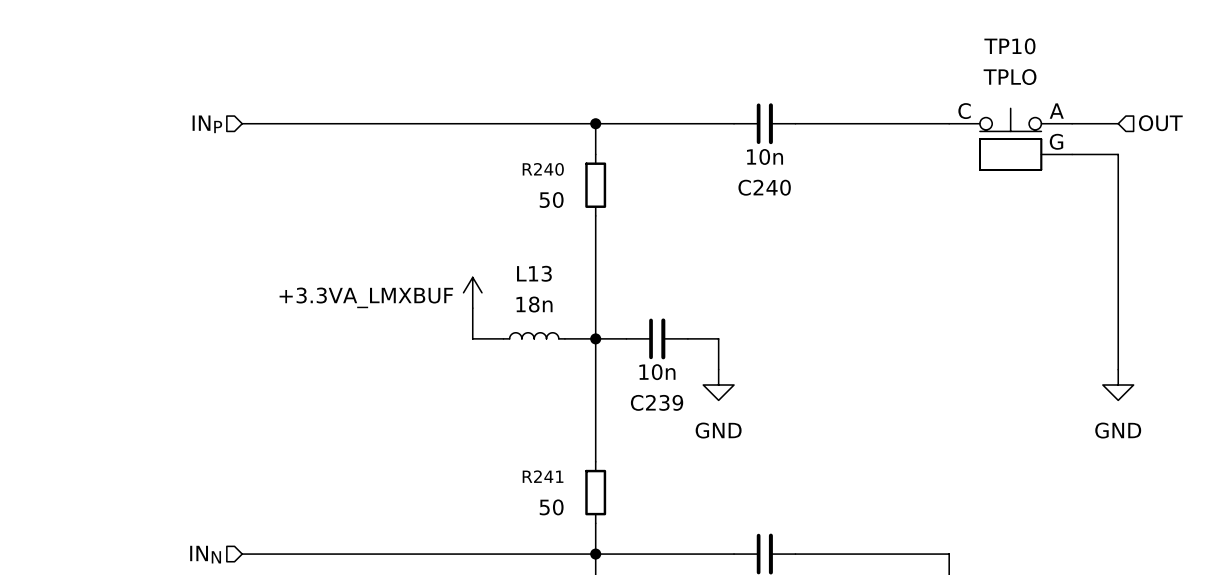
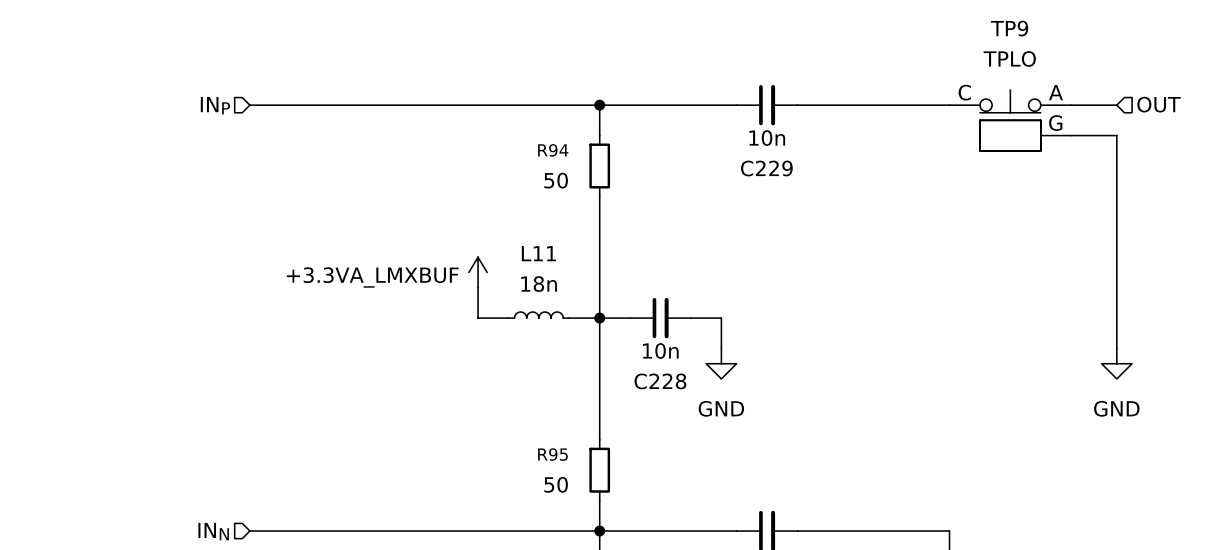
TP10 name: TP10 (1009, 46) -> TP9 (1009, 28)
R240 name: R240 (543, 169) -> R94 (553, 150)
C240 name: C240 (764, 187) -> C229 (766, 168)
L13 name: L13 (534, 273) -> L11 (538, 253)
C239 name: C239 (657, 402) -> C228 (660, 381)
R241 name: R241 (543, 476) -> R95 (552, 454)

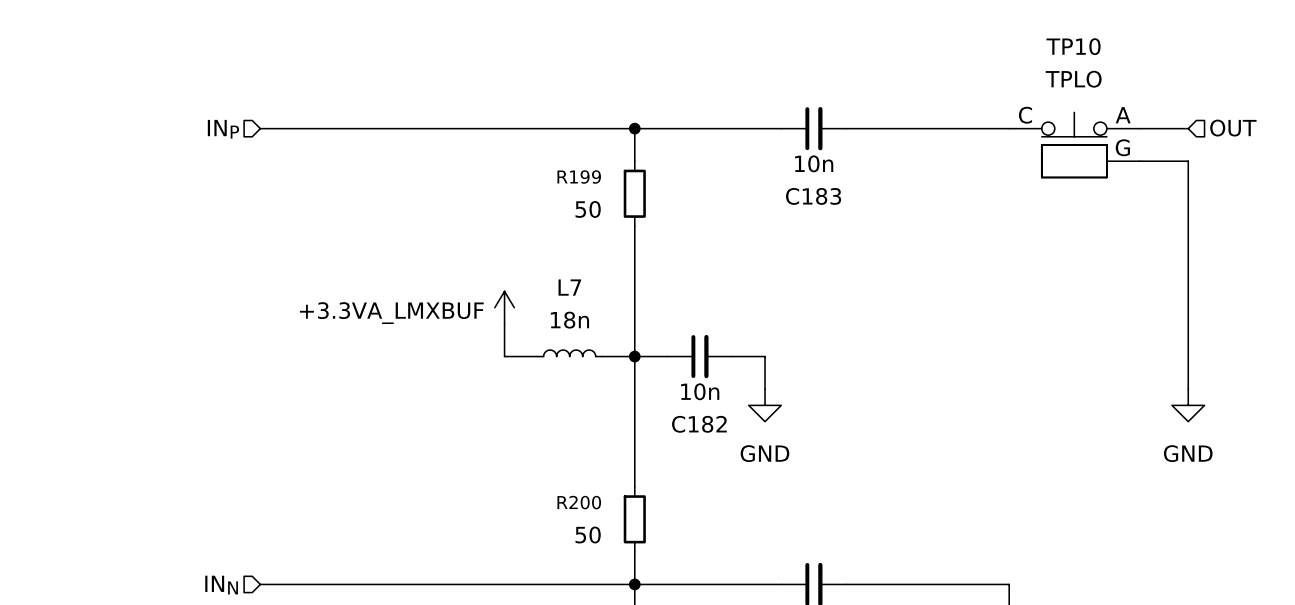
TP9 name: TP9 (1009, 28) -> TP10 (1073, 46)
R94 name: R94 (553, 150) -> R199 (579, 177)
C229 name: C229 (766, 168) -> C183 (813, 196)
L11 name: L11 (538, 253) -> L7 (569, 287)
C228 name: C228 (660, 381) -> C182 (699, 424)
R95 name: R95 (552, 454) -> R200 (579, 502)

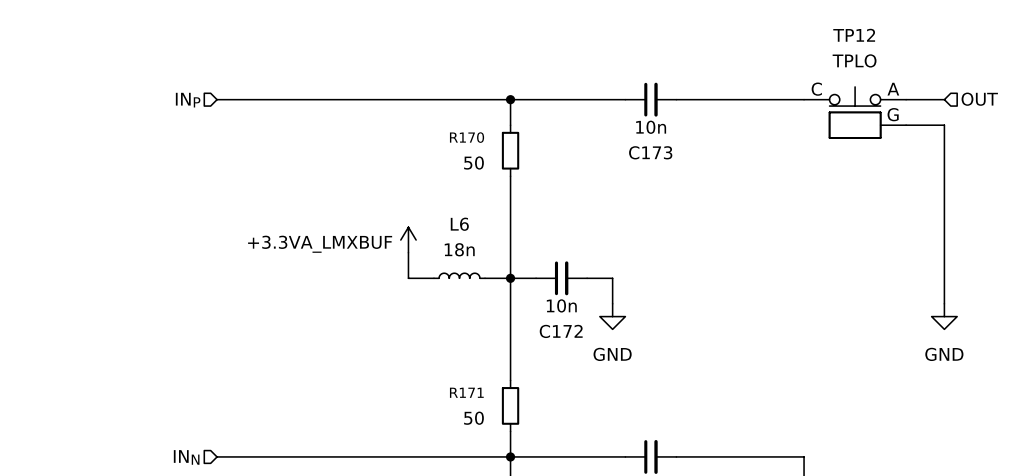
TP10 name: TP10 (1073, 46) -> TP12 (854, 35)
R199 name: R199 (579, 177) -> R170 (467, 137)
C183 name: C183 (813, 196) -> C173 (650, 152)
L7 name: L7 (569, 287) -> L6 (459, 224)
C182 name: C182 (699, 424) -> C172 (561, 331)
R200 name: R200 (579, 502) -> R171 (466, 392)

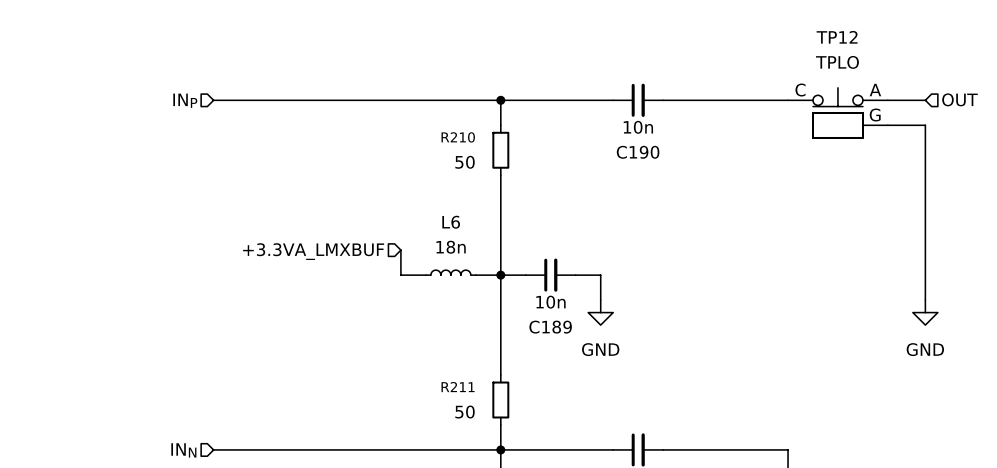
R170 name: R170 (467, 137) -> R210 (458, 137)
C173 name: C173 (650, 152) -> C190 (638, 152)
power symbol: +3.3VA_LMXBUF (408, 240) -> none
hierarchical label: none -> +3.3VA_LMXBUF (313, 251)
C172 name: C172 (561, 331) -> C189 (550, 327)
R171 name: R171 (466, 392) -> R211 (458, 387)

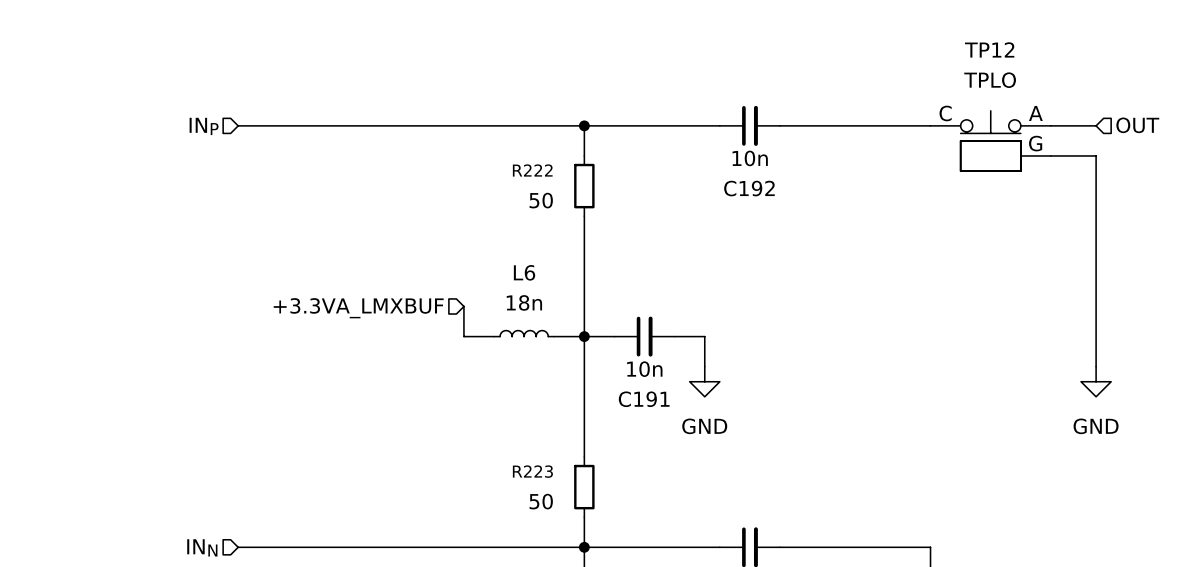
R210 name: R210 (458, 137) -> R222 (532, 170)
C190 name: C190 (638, 152) -> C192 (749, 188)
C189 name: C189 (550, 327) -> C191 (644, 399)
R211 name: R211 (458, 387) -> R223 (532, 471)

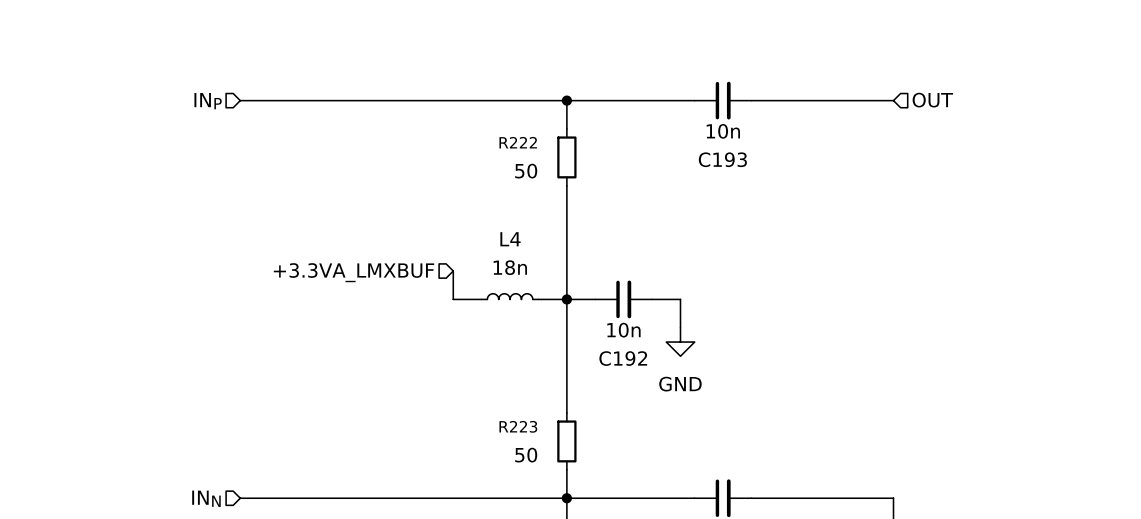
wire: (1050, 125) (1096, 125) -> none
hierarchical label position: OUT (1137, 125) -> OUT (932, 100)
TP12: TPLO (990, 140) -> none
wire: (1050, 155) (1096, 155) (1096, 366) -> none
C192 name: C192 (749, 188) -> C193 (722, 159)
L6 name: L6 (524, 272) -> L4 (510, 239)
power symbol: GND (1096, 381) -> none
C191 name: C191 (644, 399) -> C192 (623, 358)

